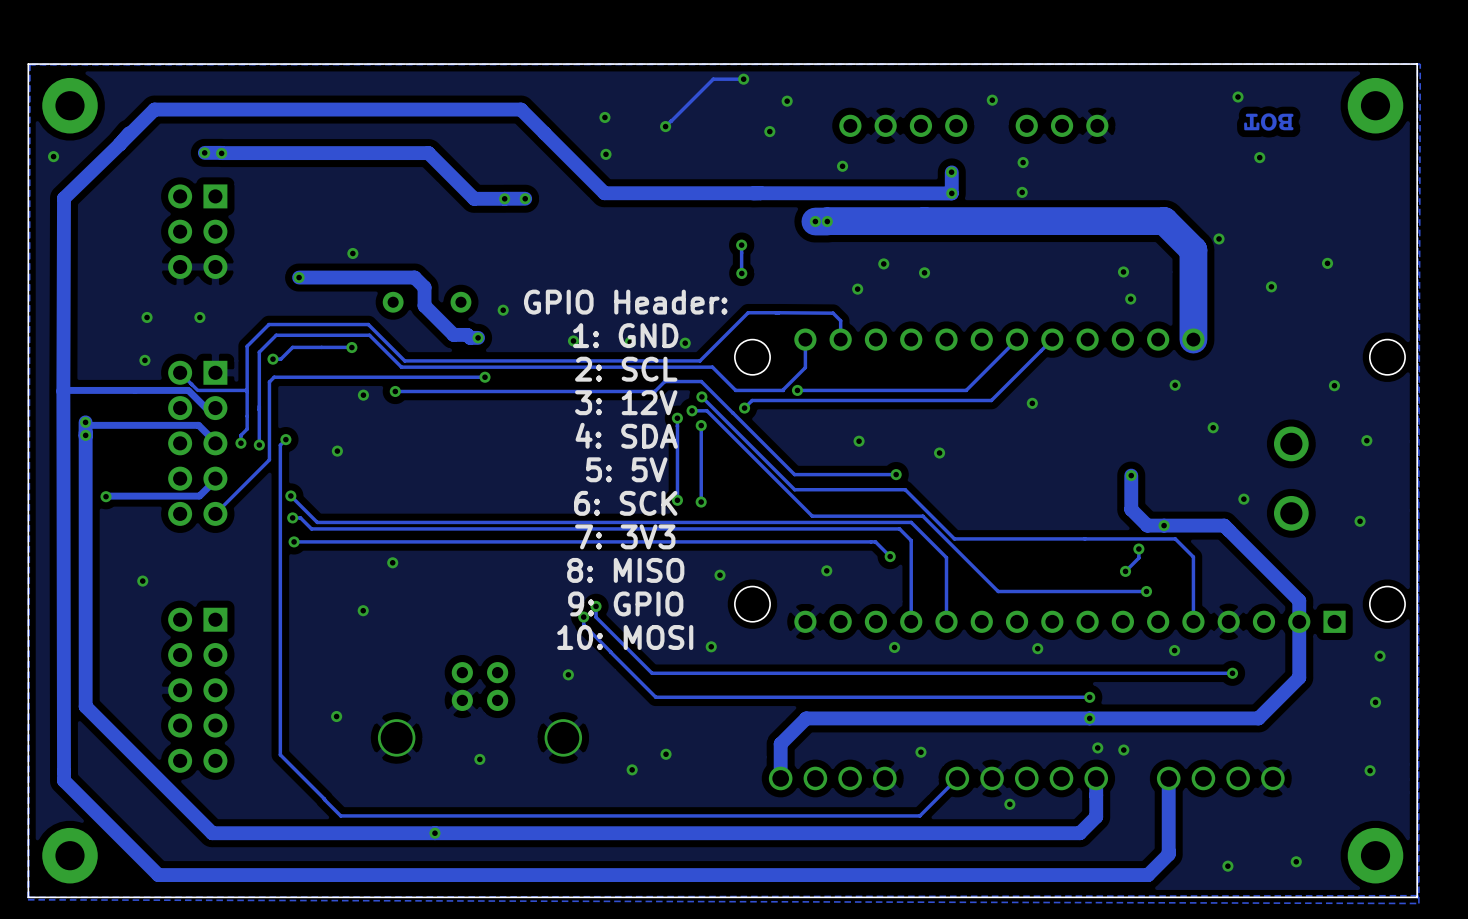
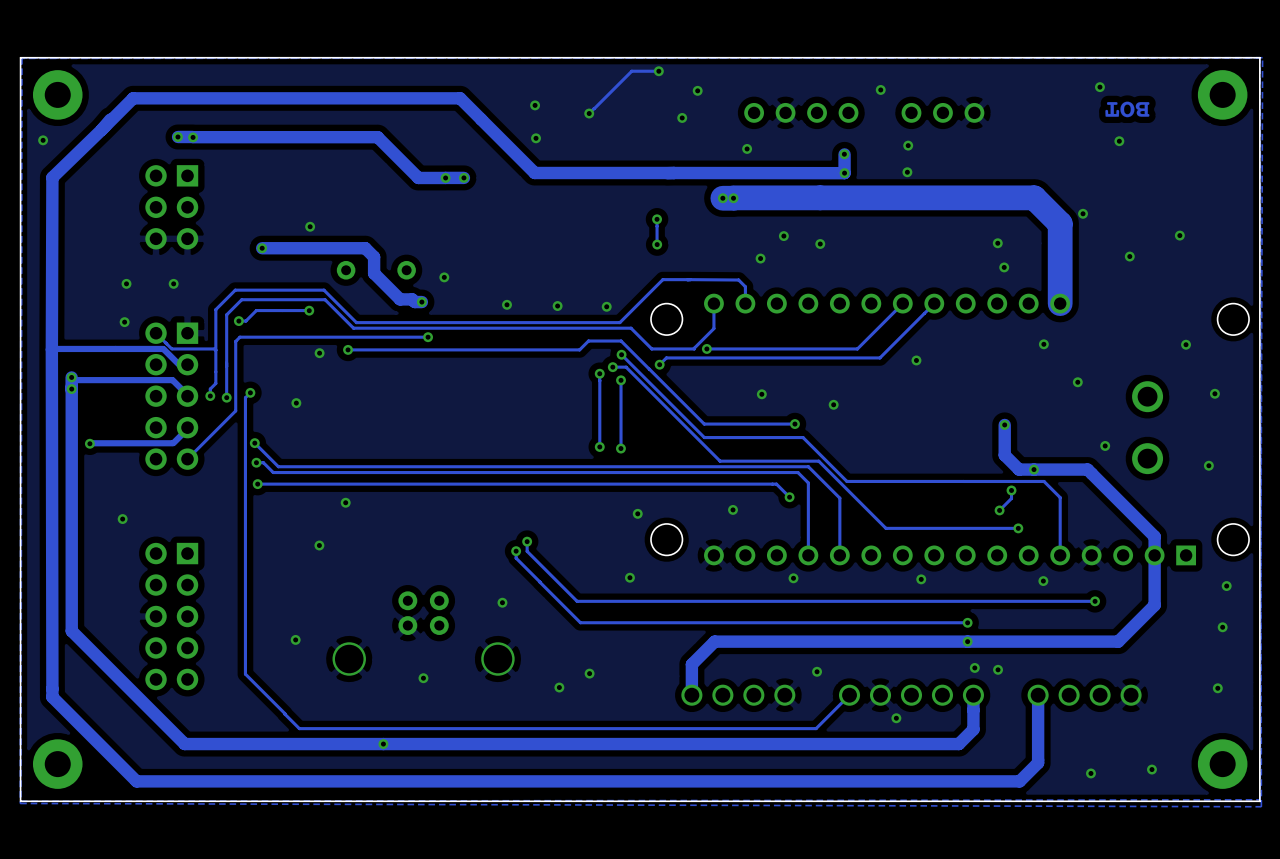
text: GPIO Header: (625, 302) -> none
text: 1: GND (625, 335) -> none
text: 2: SCL (626, 369) -> none
text: 3: 12V (626, 402) -> none
text: 4: SDA (626, 435) -> none
text: 5: 5V (626, 469) -> none
text: 6: SCK (625, 503) -> none
text: 7: 3V3 (625, 536) -> none
text: 8: MISO (625, 570) -> none
text: 9: GPIO (625, 603) -> none
text: 10: MOSI (625, 637) -> none

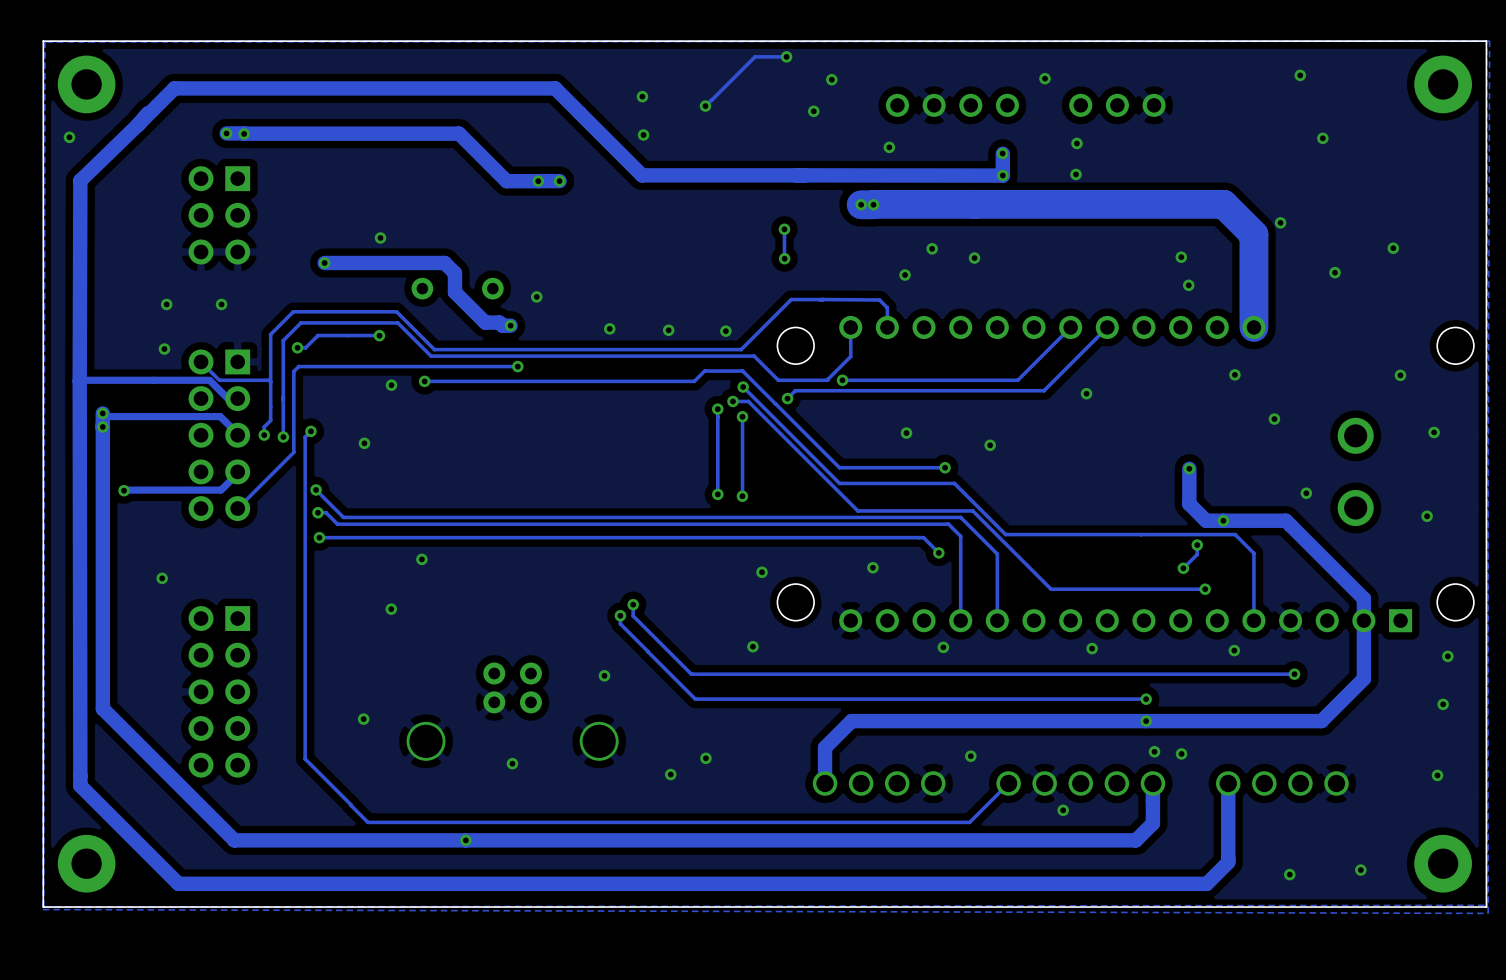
drawing: [1105, 101, 1150, 118] -> none

